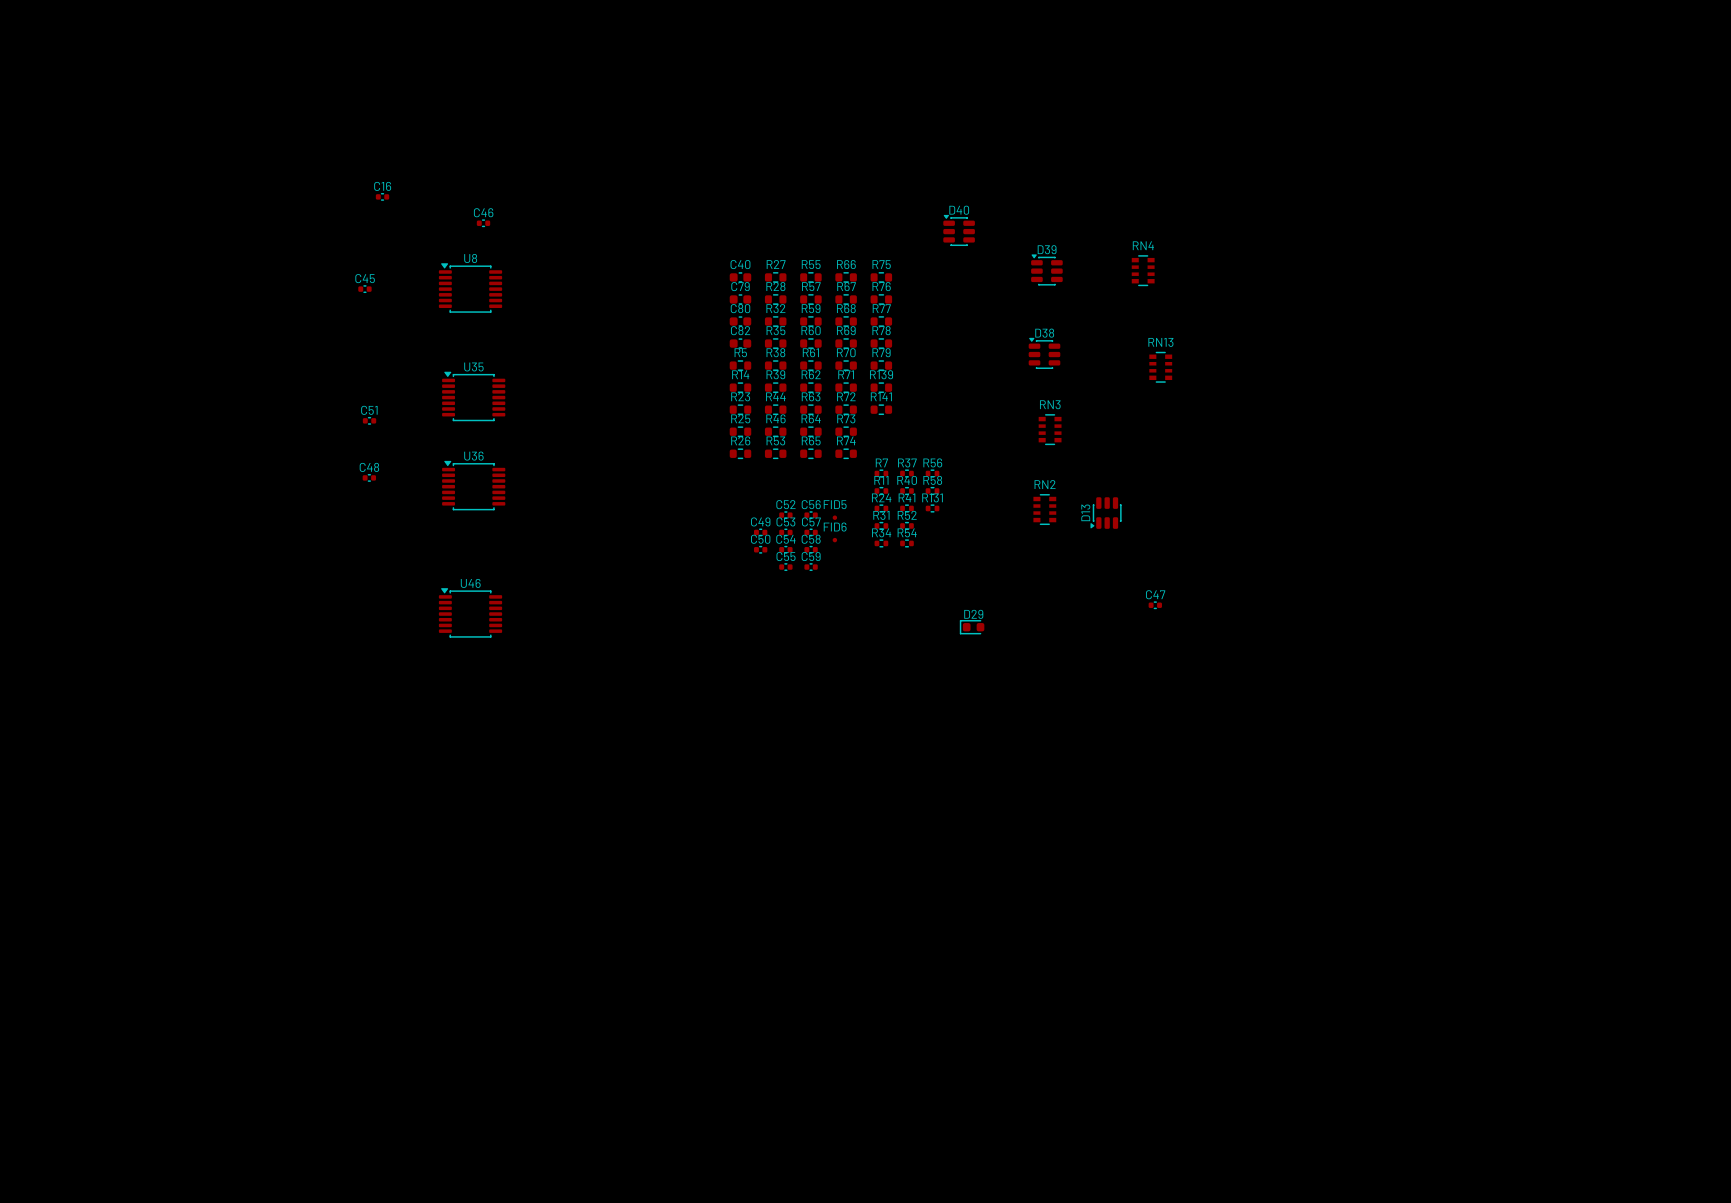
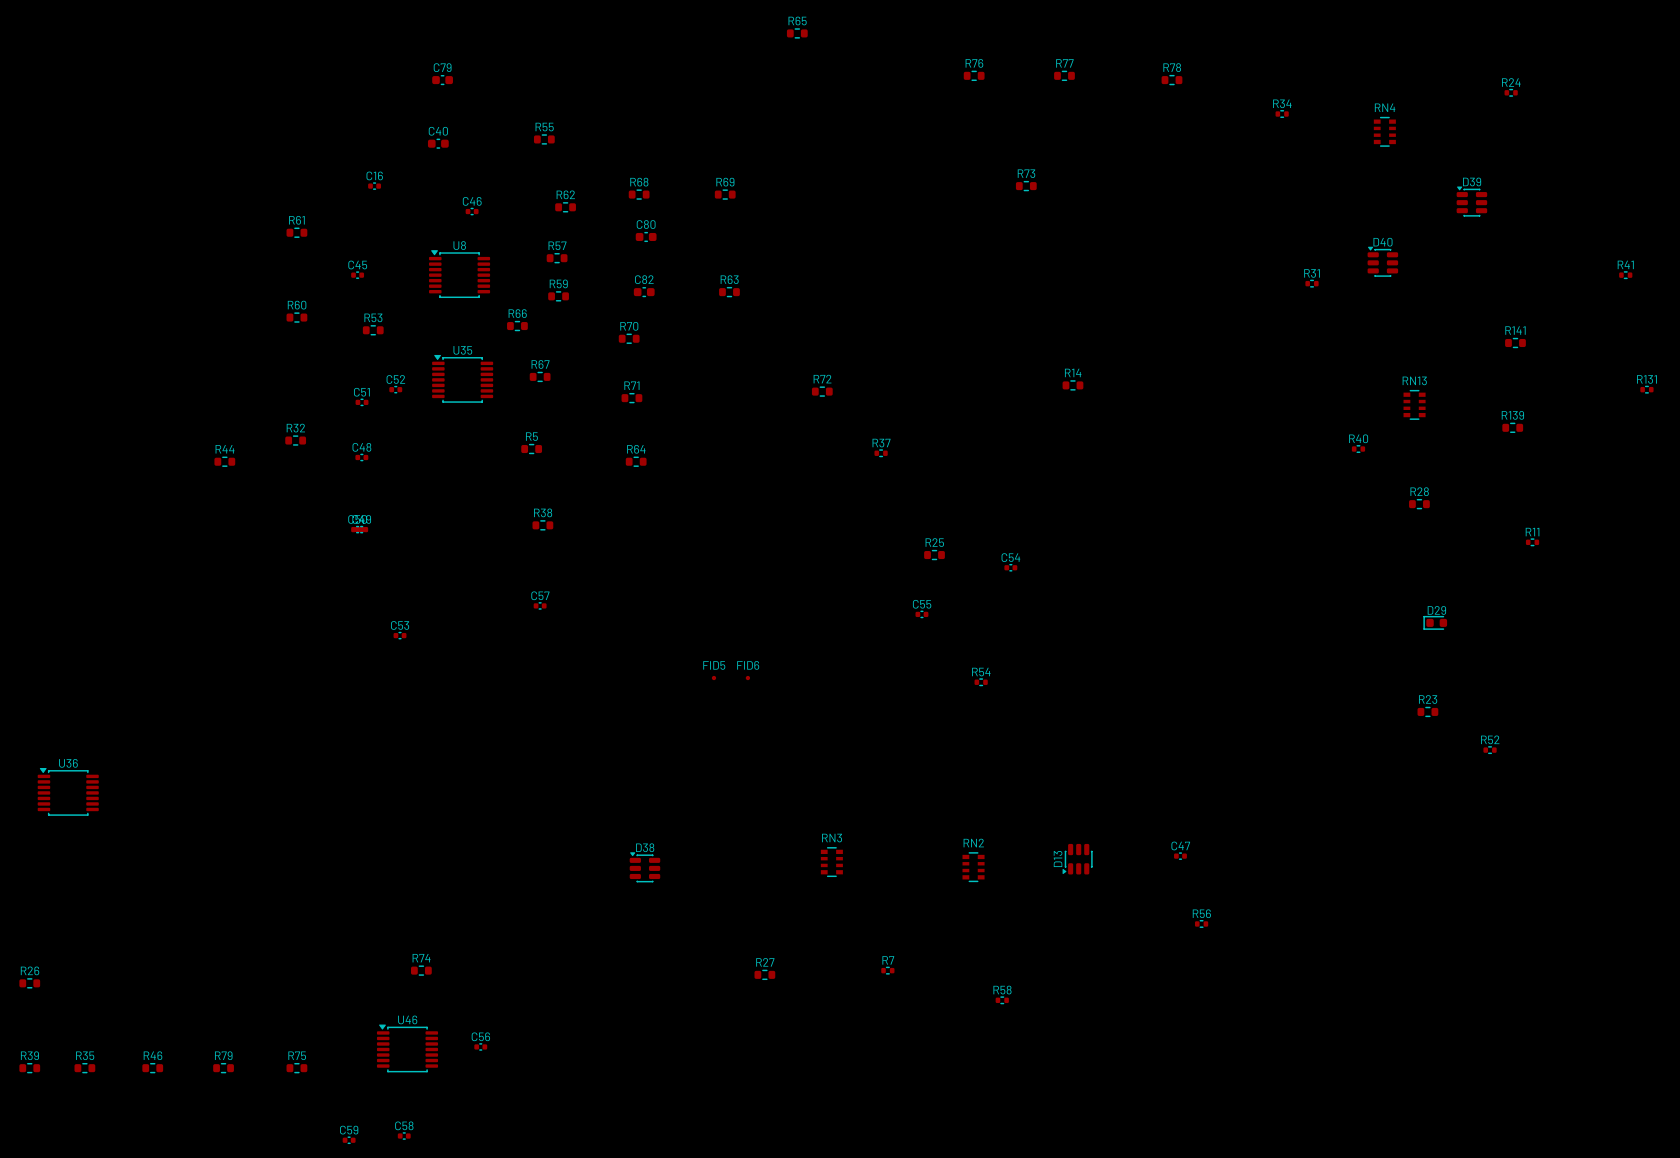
D40 position: (959, 230) -> (1382, 261)
D39 position: (1046, 269) -> (1471, 201)
RN4 position: (1143, 270) -> (1384, 131)
C40 position: (740, 277) -> (438, 143)
R27 position: (775, 277) -> (764, 974)
R55 position: (810, 277) -> (544, 139)
R66 position: (846, 277) -> (517, 326)
R75 position: (881, 277) -> (296, 1068)
C79 position: (740, 299) -> (442, 80)
R28 position: (775, 299) -> (1419, 504)
R57 position: (810, 299) -> (557, 258)
R67 position: (846, 299) -> (540, 376)
R76 position: (881, 299) -> (974, 75)
C80 position: (740, 321) -> (646, 236)
R32 position: (775, 321) -> (295, 440)
R59 position: (810, 321) -> (558, 296)
R68 position: (846, 321) -> (639, 194)
R77 position: (881, 321) -> (1064, 75)
C82 position: (740, 343) -> (644, 292)
R35 position: (775, 343) -> (84, 1068)
R60 position: (810, 343) -> (296, 317)
R69 position: (846, 343) -> (725, 194)
R78 position: (881, 343) -> (1171, 80)
D38 position: (1044, 353) -> (644, 867)
R5 position: (740, 365) -> (531, 449)
R38 position: (775, 365) -> (542, 525)
R61 position: (810, 365) -> (296, 232)
R70 position: (846, 365) -> (629, 338)
R79 position: (881, 365) -> (223, 1068)
RN13 position: (1160, 367) -> (1414, 404)
R14 position: (740, 387) -> (1072, 385)
R39 position: (775, 387) -> (29, 1068)
R62 position: (810, 387) -> (565, 207)
R71 position: (846, 387) -> (631, 398)
R139 position: (881, 387) -> (1512, 427)
R23 position: (740, 409) -> (1427, 711)
R44 position: (775, 409) -> (224, 461)
R63 position: (810, 409) -> (729, 292)
R141 position: (881, 409) -> (1515, 343)
RN3 position: (1050, 429) -> (831, 862)
R25 position: (740, 431) -> (934, 555)
R46 position: (775, 431) -> (152, 1068)
R64 position: (810, 431) -> (636, 461)
R73 position: (846, 431) -> (1026, 186)
R26 position: (740, 453) -> (29, 983)
R53 position: (775, 453) -> (373, 330)
R65 position: (810, 453) -> (797, 33)
R74 position: (846, 453) -> (421, 970)
R7 position: (881, 473) -> (887, 970)
R56 position: (932, 473) -> (1201, 923)
U36 position: (473, 485) -> (68, 791)
R11 position: (881, 491) -> (1532, 542)
R40 position: (906, 491) -> (1358, 449)
R58 position: (932, 491) -> (1002, 1000)
R24 position: (881, 508) -> (1511, 92)
R41 position: (906, 508) -> (1625, 275)
R131 position: (932, 508) -> (1646, 389)
RN2 position: (1044, 509) -> (973, 867)
D13 position: (1105, 513) -> (1077, 859)
C52 position: (785, 515) -> (395, 389)
C56 position: (811, 515) -> (480, 1046)
FID5 position: (834, 517) -> (713, 678)
R31 position: (881, 525) -> (1312, 283)
R52 position: (906, 525) -> (1490, 750)
C49 position: (760, 532) -> (361, 529)
C53 position: (785, 532) -> (400, 635)
C57 position: (811, 532) -> (540, 605)
FID6 position: (834, 540) -> (747, 678)
R34 position: (881, 543) -> (1282, 114)
R54 position: (906, 543) -> (981, 682)
C50 position: (760, 549) -> (357, 529)
C54 position: (785, 549) -> (1010, 567)
C58 position: (811, 549) -> (404, 1136)
C55 position: (785, 567) -> (921, 614)
C59 position: (811, 567) -> (349, 1140)
C47 position: (1155, 605) -> (1180, 856)
U46 position: (470, 612) -> (407, 1048)
D29 position: (972, 627) -> (1435, 622)

